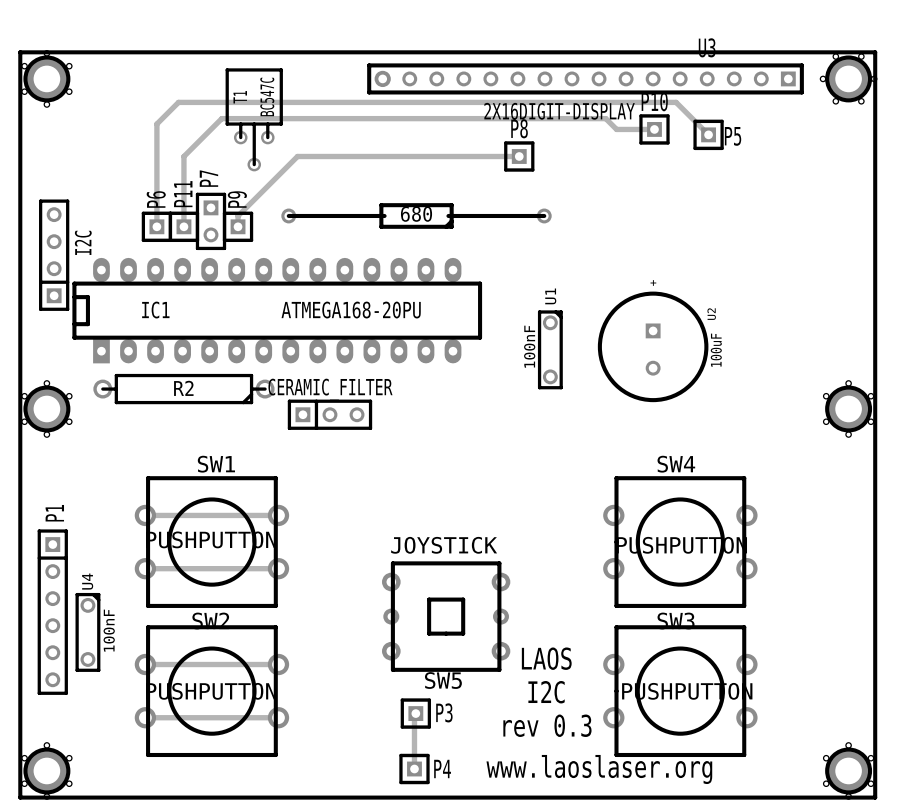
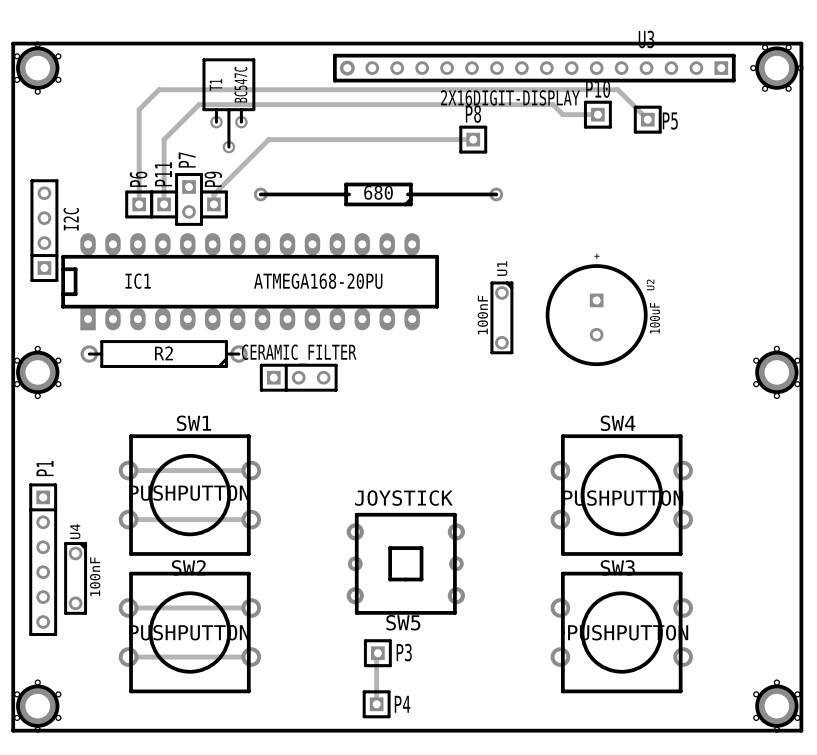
text: LAOS (546, 658) -> none
text: I2C (546, 692) -> none
text: rev 0.3 (547, 725) -> none
text: www.laoslaser.org (599, 769) -> none

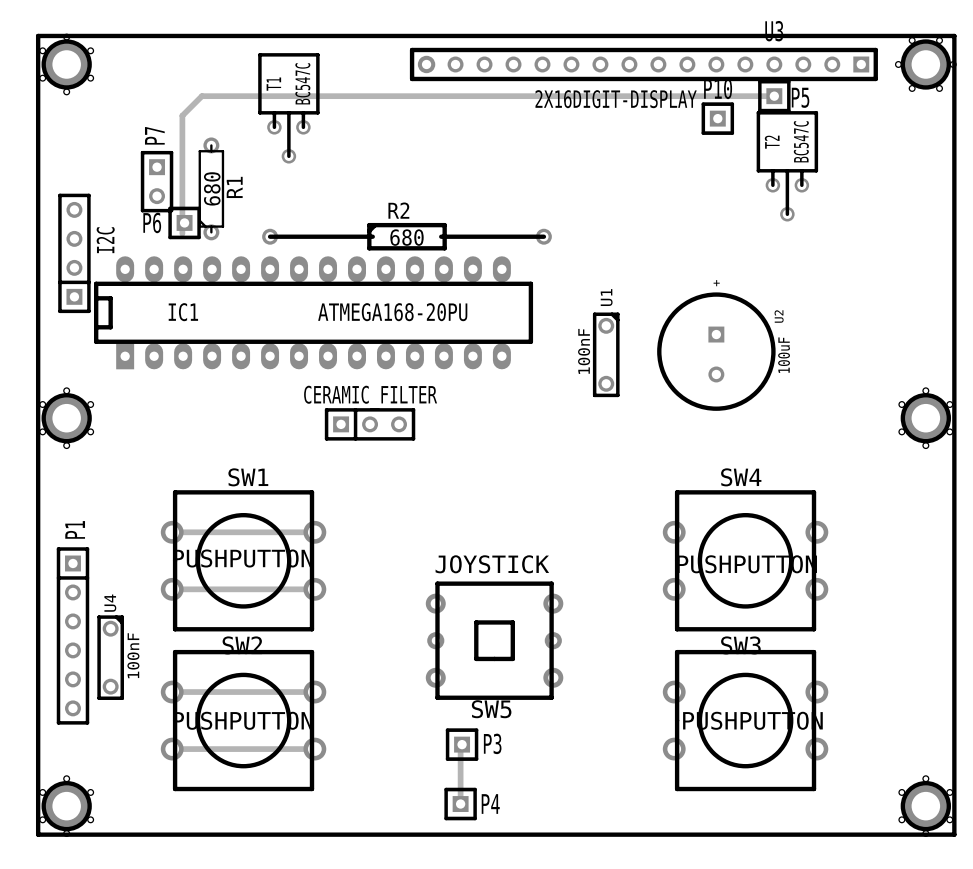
track: none -> (774, 96) (201, 96) (182, 115) (182, 233)
track: (597, 114) (563, 114) (553, 104) (199, 104) (164, 139) (164, 204) -> none
track: (647, 119) (617, 89) (159, 89) (139, 109) (139, 204) -> none
P5 position: (647, 119) -> (774, 96)
track: (473, 139) (268, 139) (213, 194) (213, 204) -> none
P8: (473, 139) -> none
T2: none -> BC547C (787, 166)
R1: none -> 680 (211, 188)
P6 name rotation: 0° (138, 179) -> 90° clockwise (152, 222)
P6 name position: P6 (138, 179) -> P6 (152, 222)
part: 680 (378, 194) -> none
P7 position: (189, 199) -> (157, 181)
P11: (164, 204) -> none
P9: (213, 204) -> none
R2 value: none -> 680 (407, 237)
R2 footprint: [80, 340, 248, 368] -> [262, 222, 552, 251]
R2 name position: R2 (163, 353) -> R2 (398, 210)

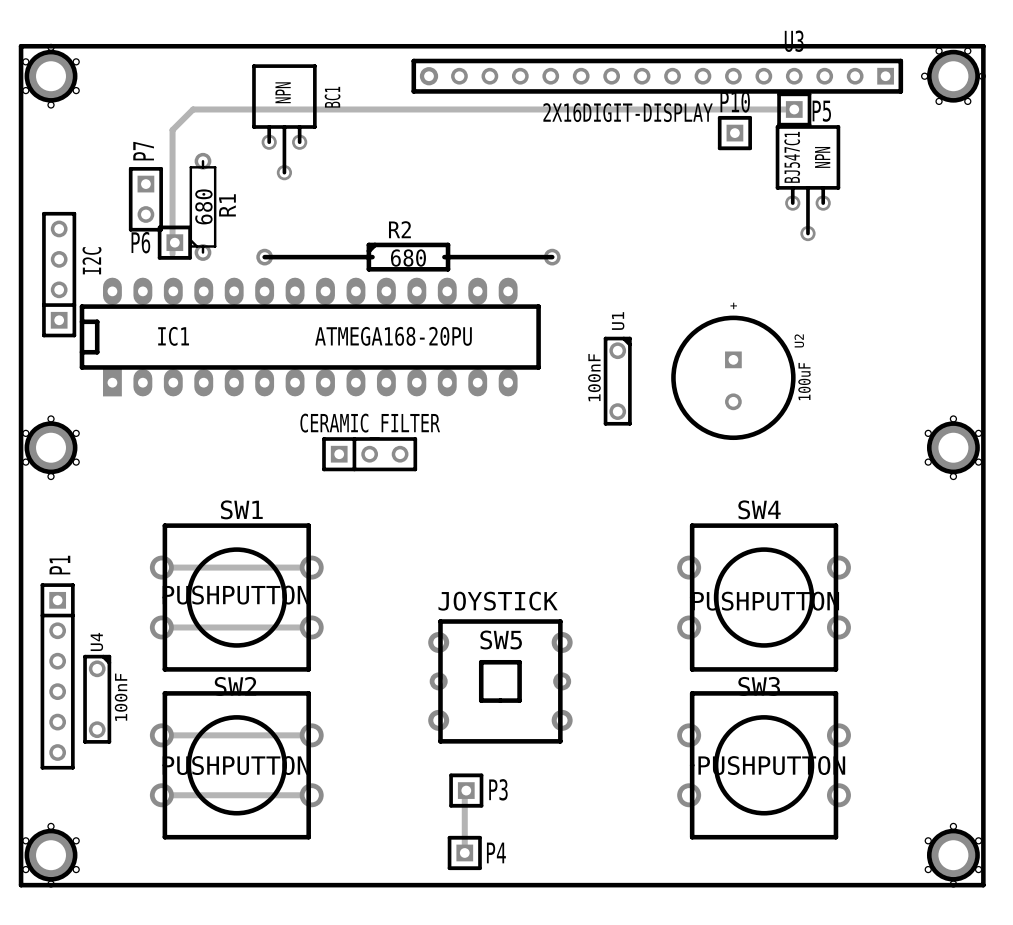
T1 value: BC547C (302, 83) -> NPN (283, 92)
T1 name: T1 (273, 84) -> BC1 (332, 97)
T2 value: BC547C (801, 141) -> NPN (822, 157)
T2 name: T2 (772, 142) -> BJ547C1 (792, 157)
SW5 name position: SW5 (491, 709) -> SW5 (501, 639)

